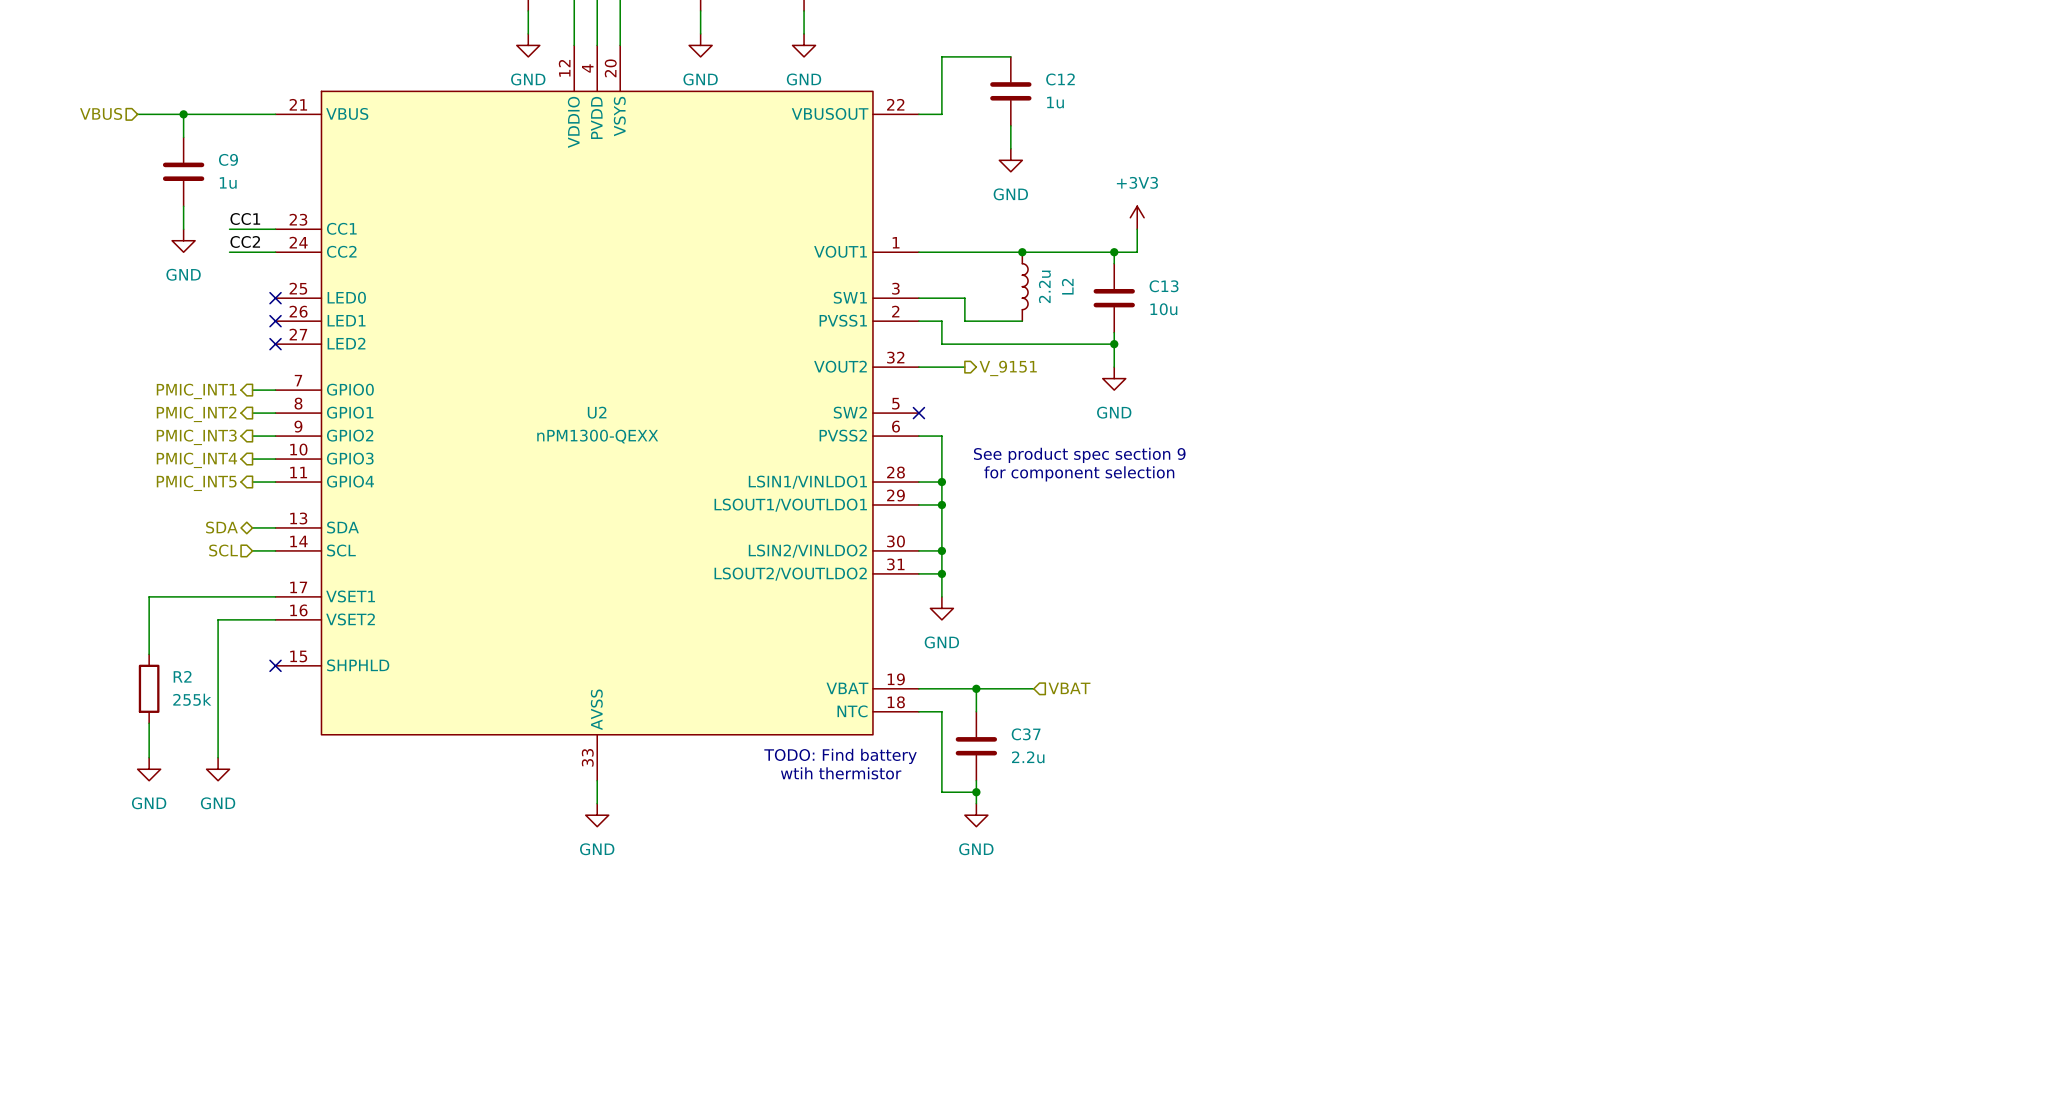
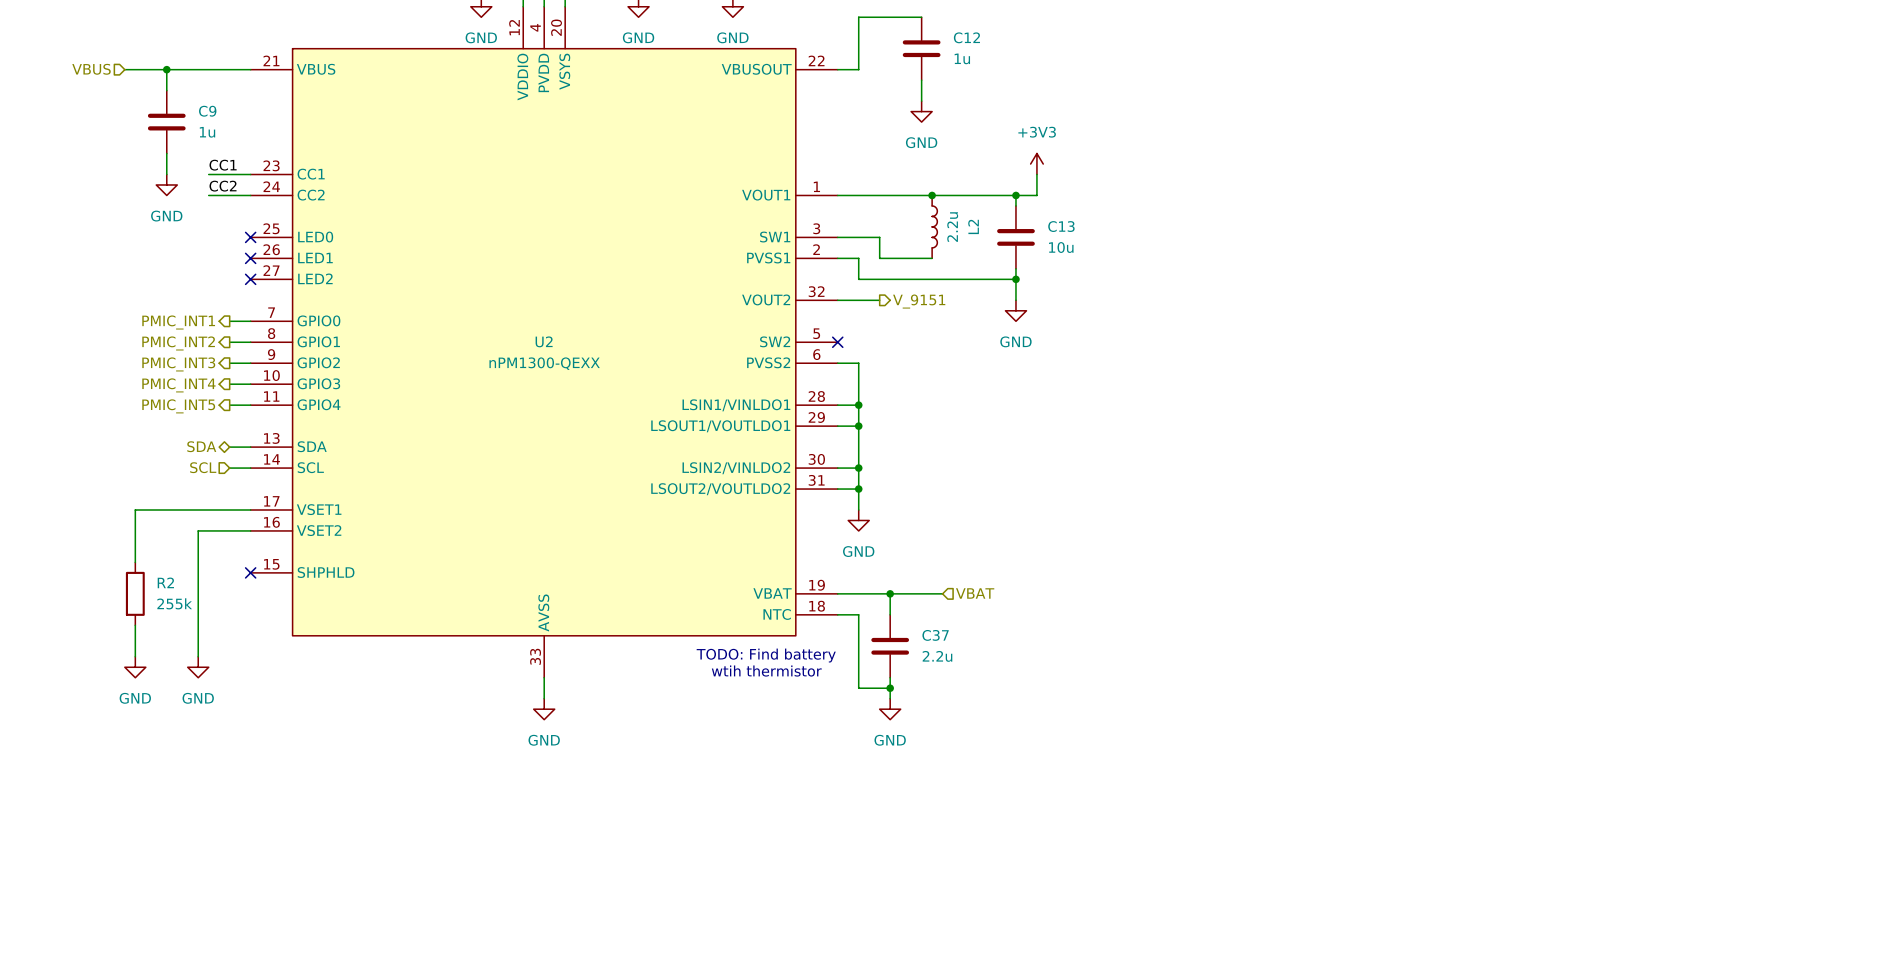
text: See product spec section 9 (1079, 455) -> none
text: for component selection (1079, 473) -> none

